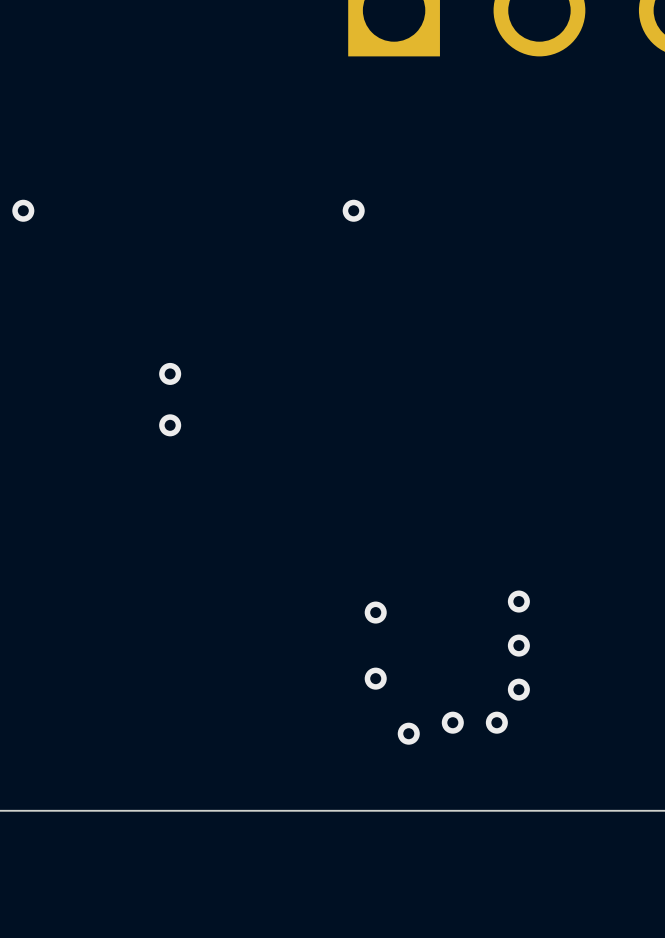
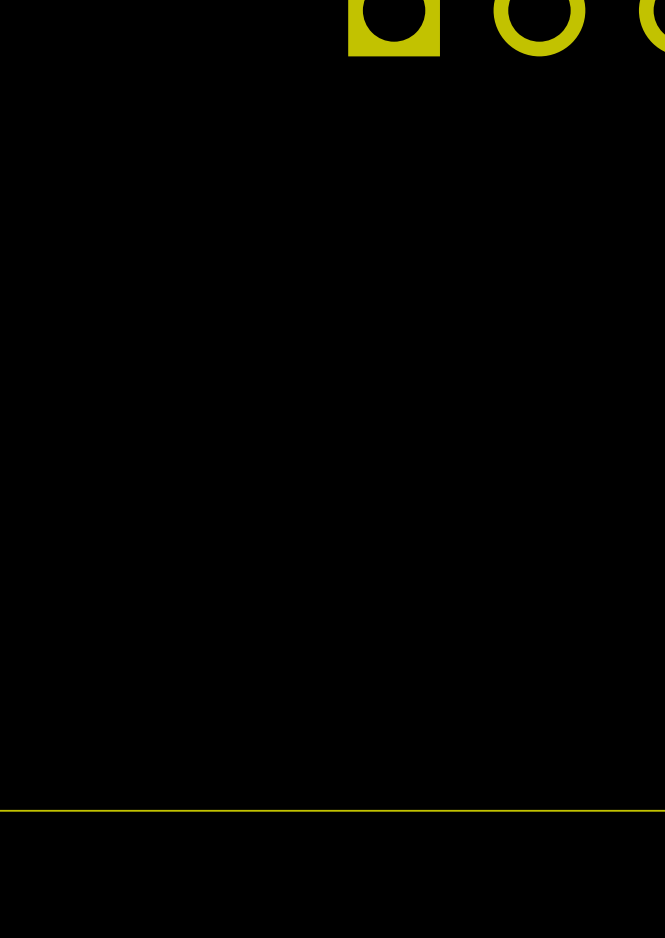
via: (23, 210) -> none
via: (353, 210) -> none
via: (170, 373) -> none
via: (170, 425) -> none
via: (518, 601) -> none
via: (375, 612) -> none
via: (518, 645) -> none
via: (375, 678) -> none
via: (518, 689) -> none
via: (452, 722) -> none
via: (496, 722) -> none
via: (408, 733) -> none

